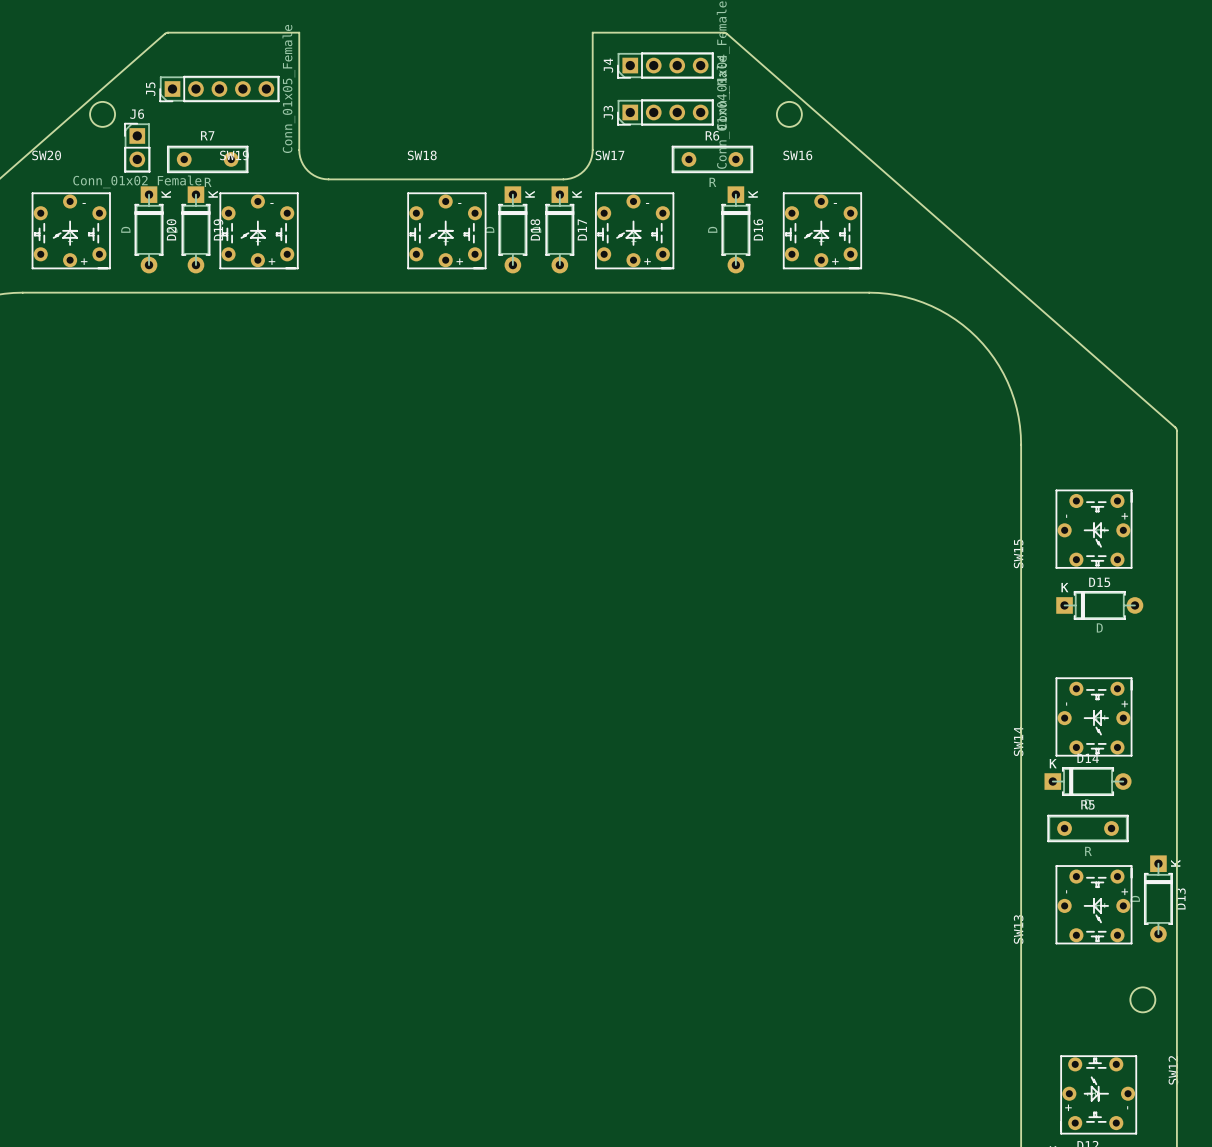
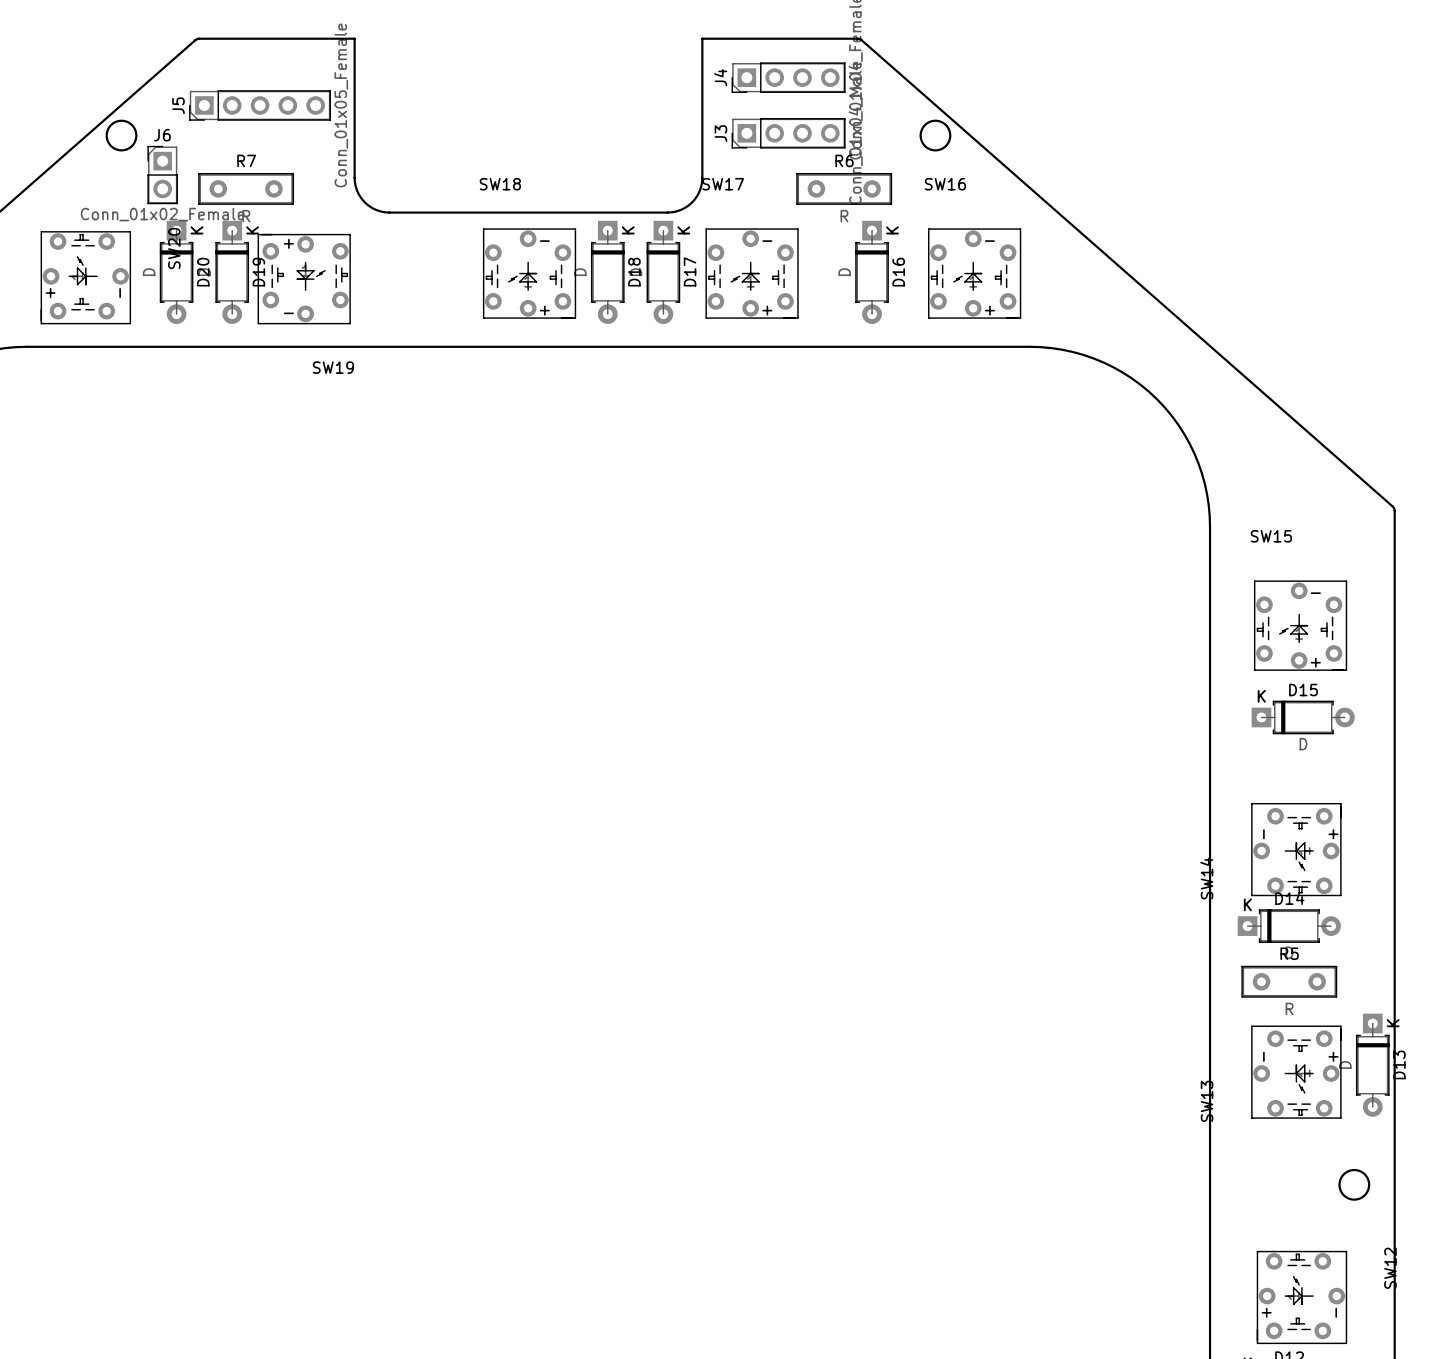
SW20 rotation: 0° (71, 230) -> 90° clockwise (85, 277)
SW19 rotation: 0° (259, 230) -> 180° (304, 279)
SW15 rotation: 0° (1093, 529) -> 90° clockwise (1300, 625)

